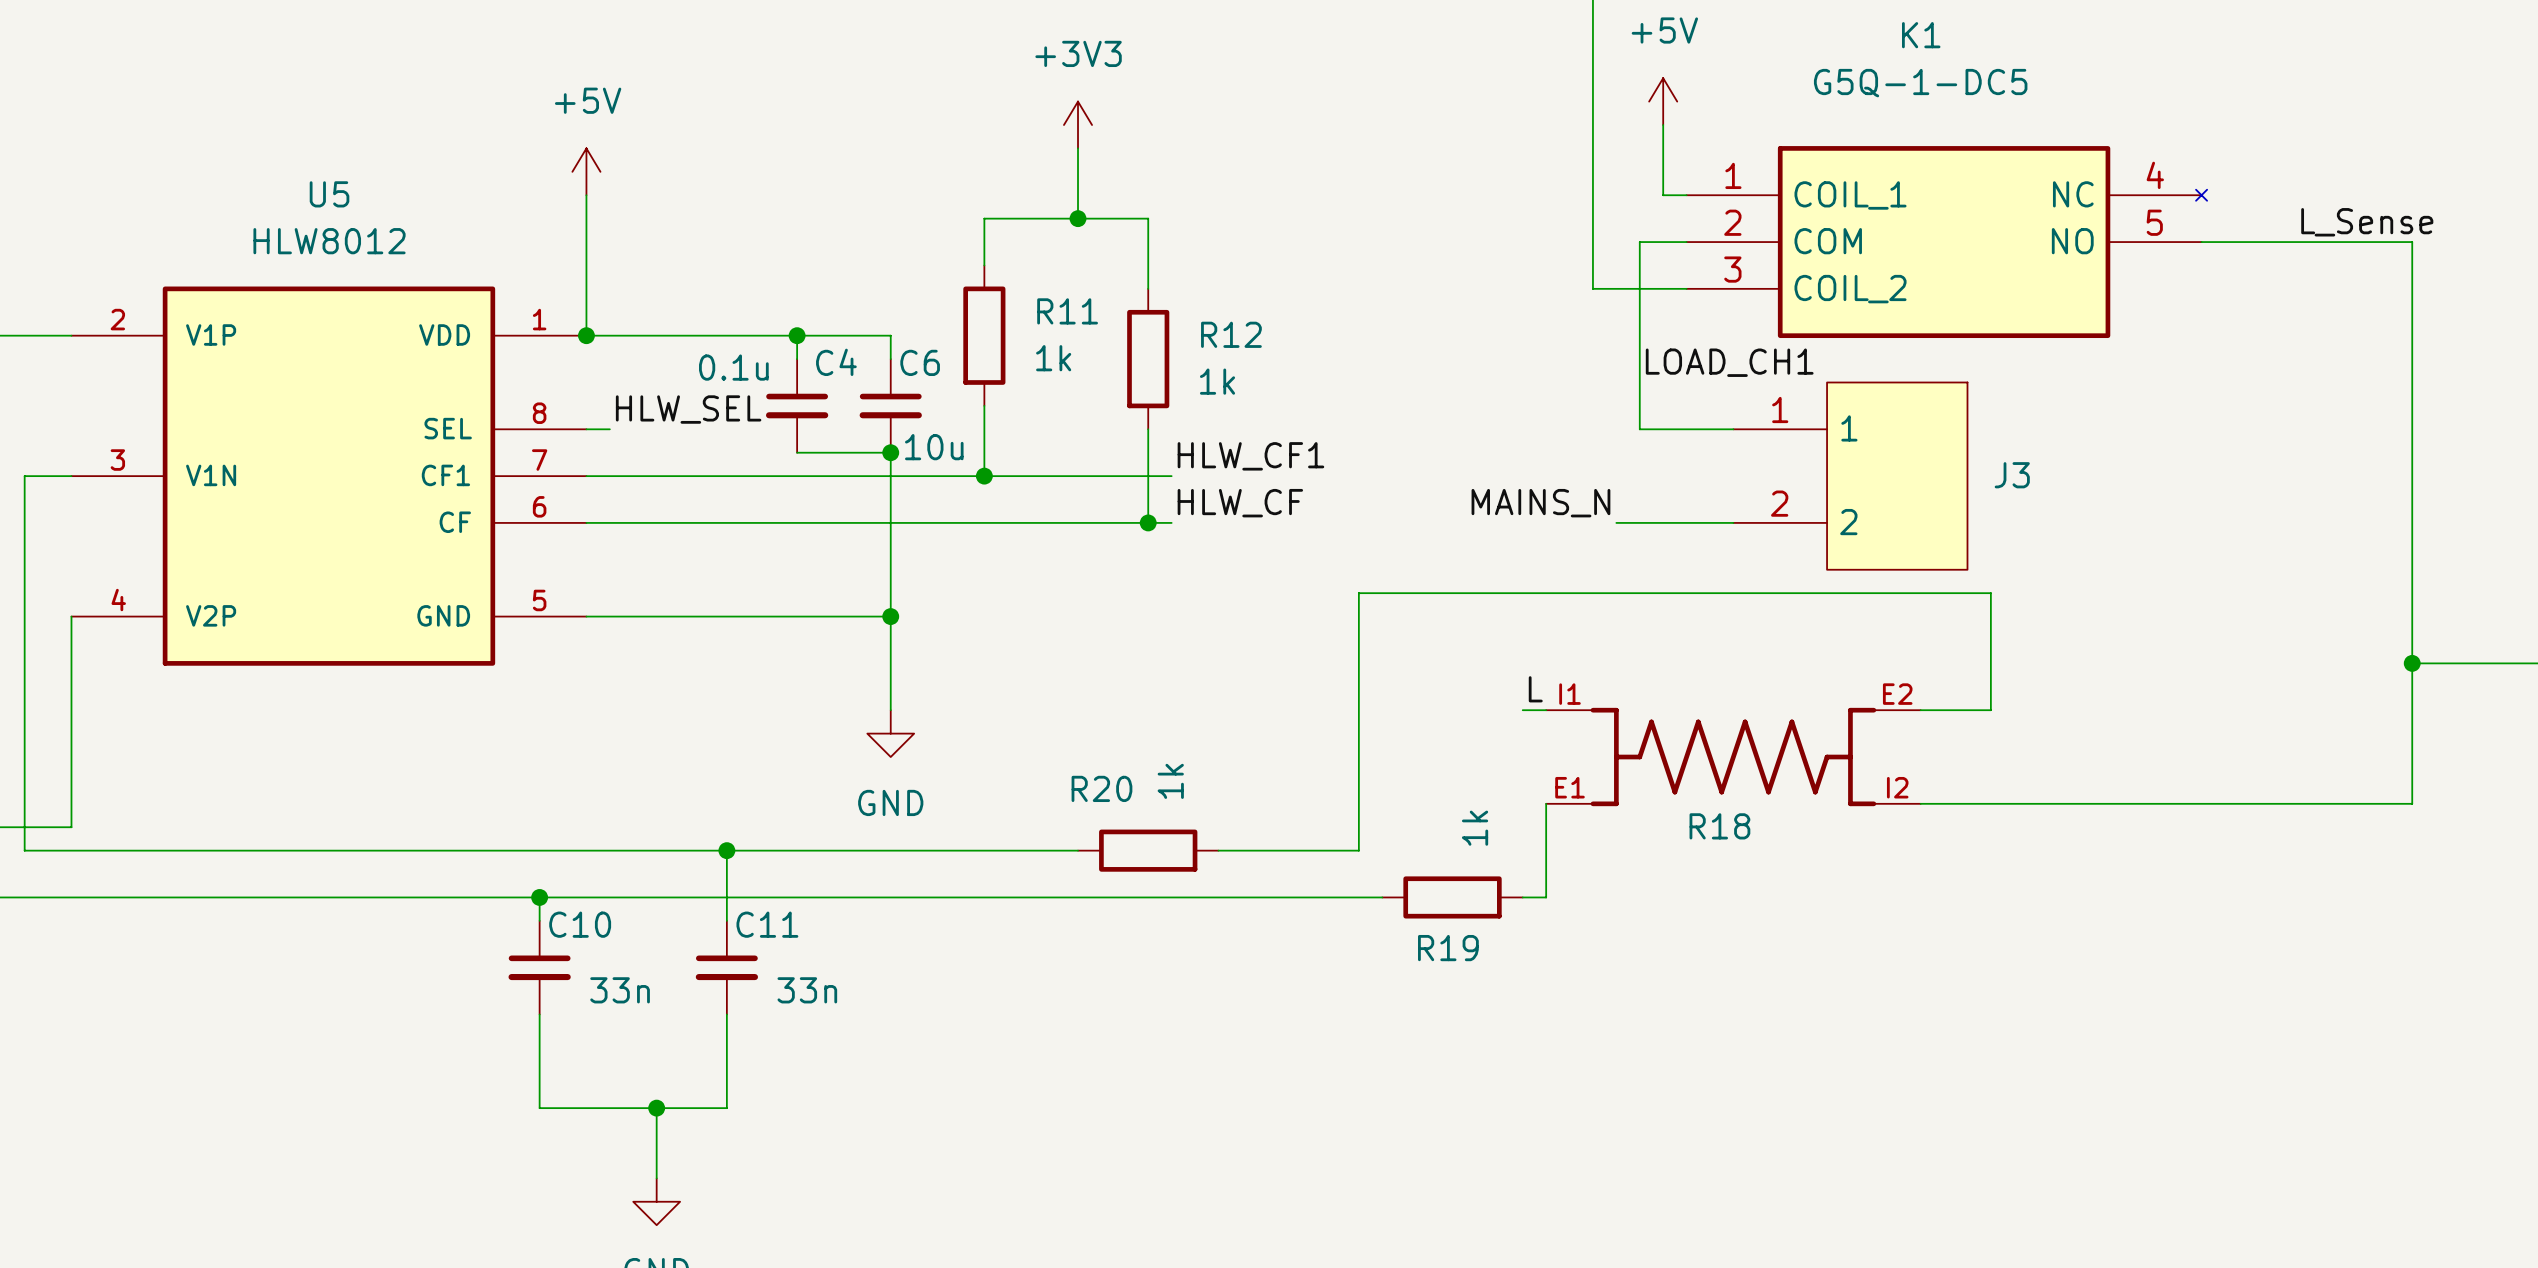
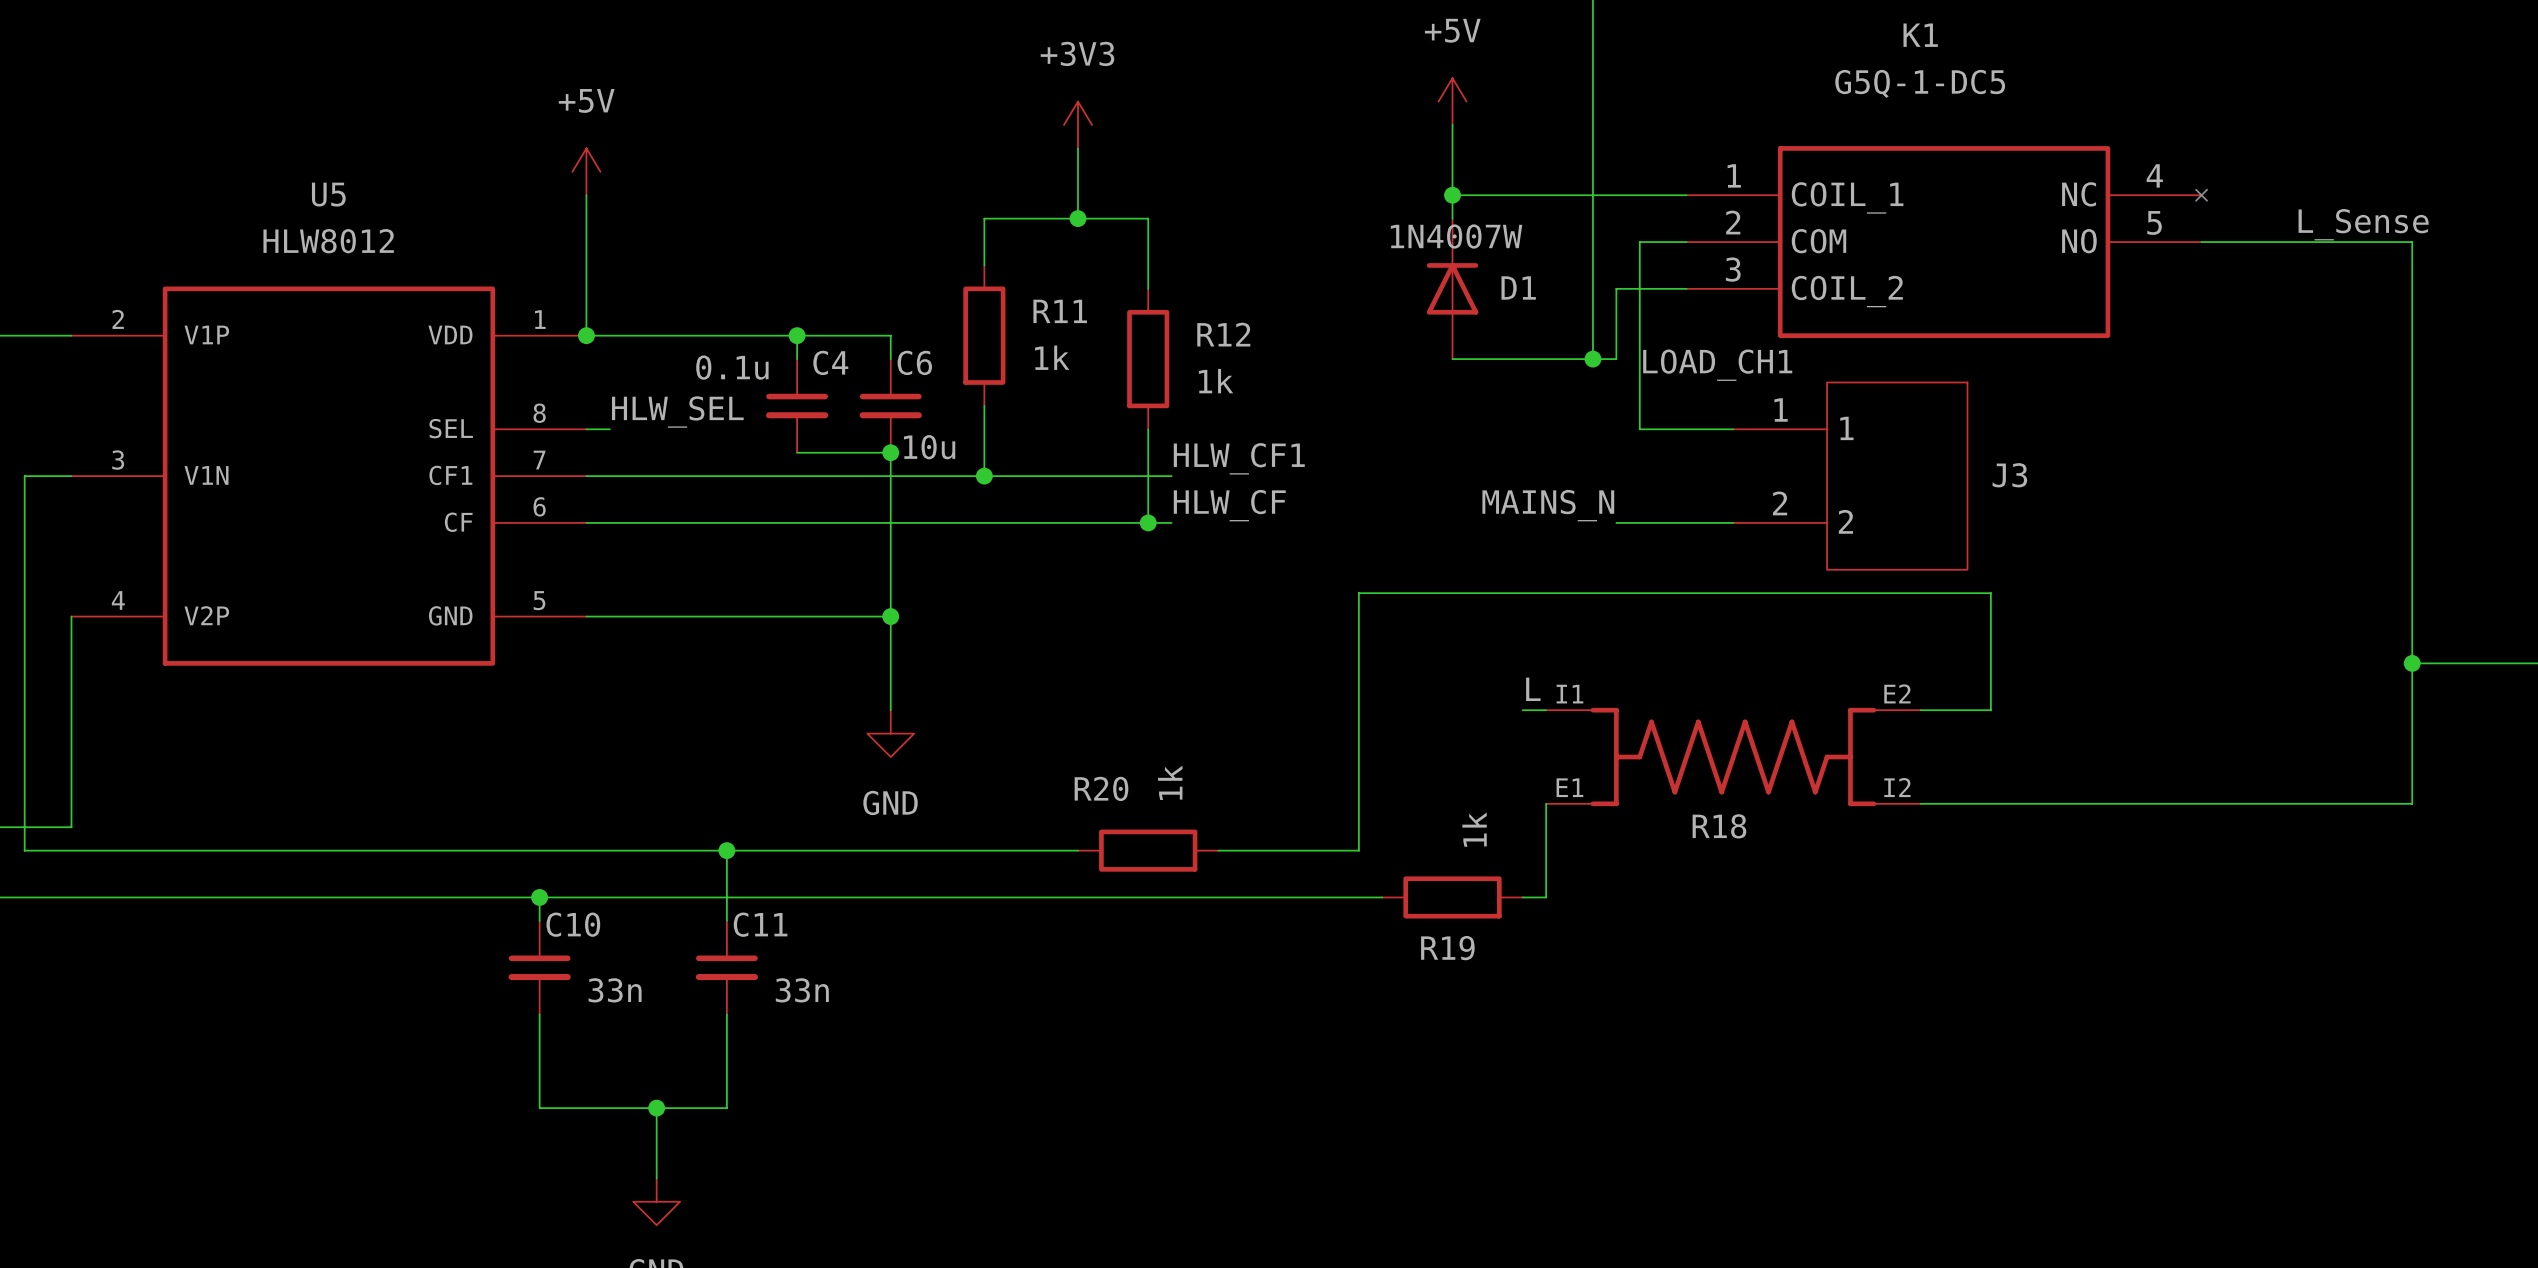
power symbol position: +5V (1663, 101) -> +5V (1452, 101)
wire: none -> (1452, 125) (1452, 218)
wire: (1663, 125) (1663, 195) -> (1452, 195) (1663, 195)
junction: none -> (1452, 195)
D1: none -> 1N4007W (1452, 288)
wire: (1592, 288) (1616, 288) -> (1592, 288) (1592, 359)
wire: none -> (1616, 288) (1616, 359) (1452, 359)
junction: none -> (1592, 359)

